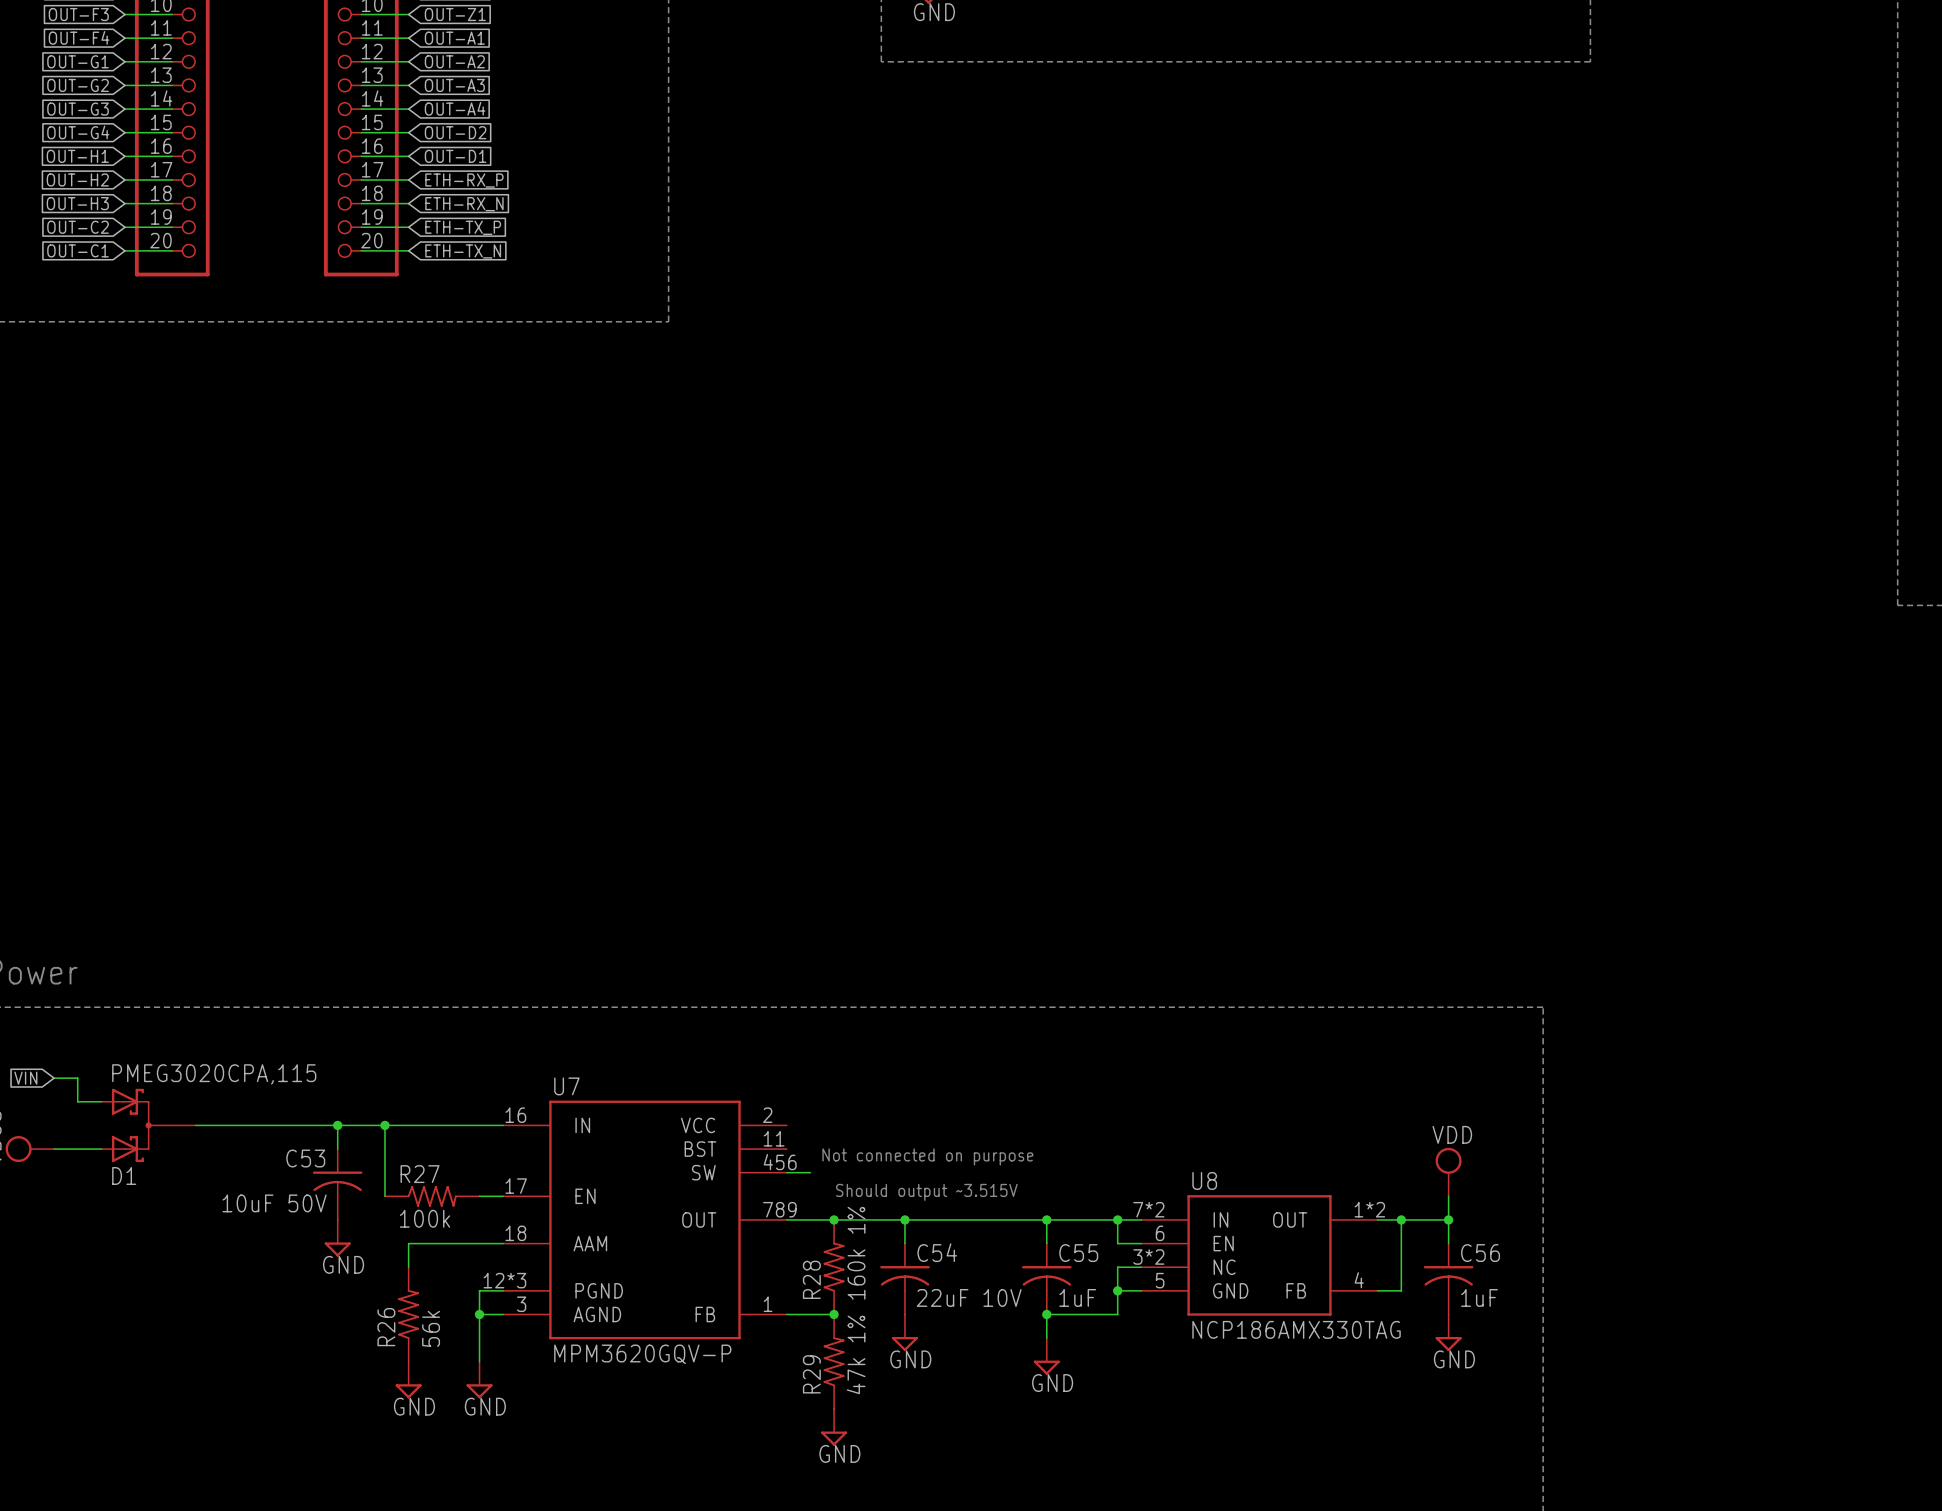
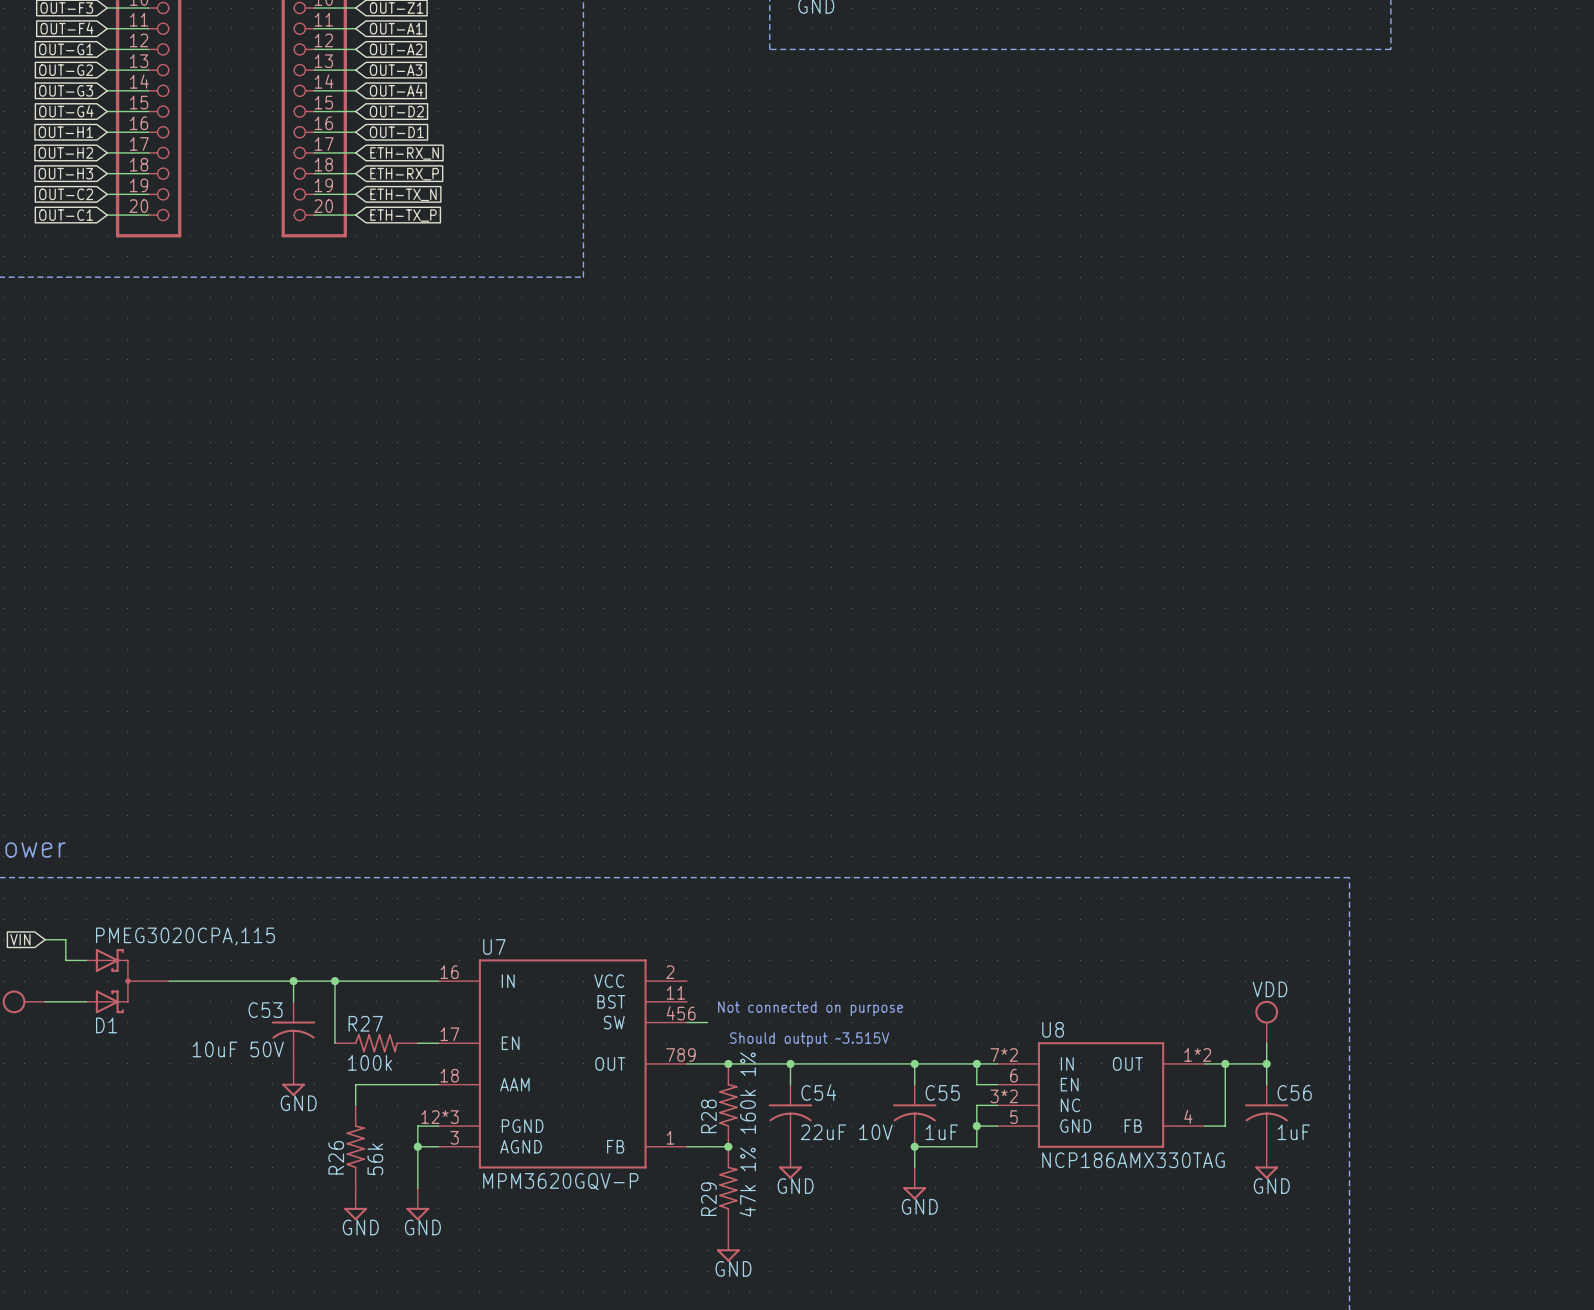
global label: ETH-RX_P (464, 180) -> ETH-RX_N (404, 153)
global label: ETH-RX_N (464, 204) -> ETH-RX_P (404, 174)
global label: ETH-TX_P (463, 227) -> ETH-TX_N (403, 194)
global label: ETH-TX_N (463, 251) -> ETH-TX_P (403, 215)

